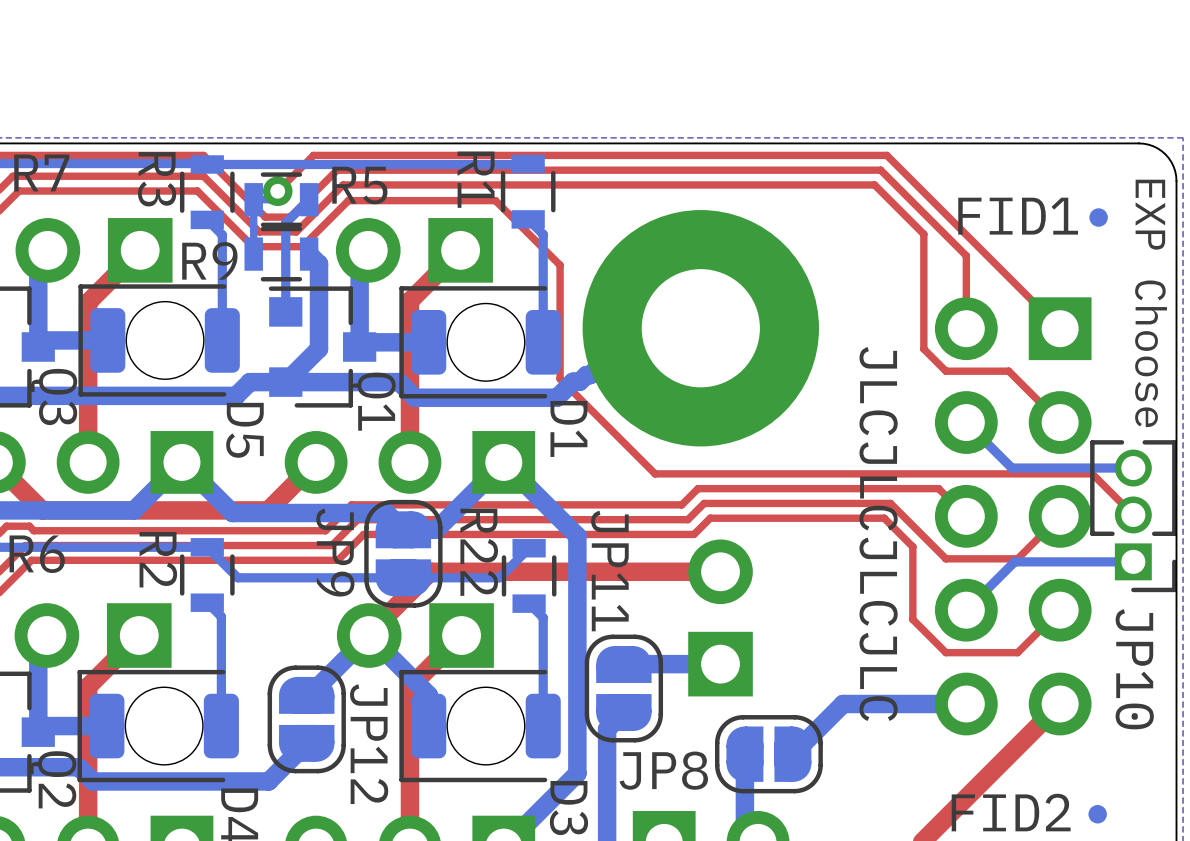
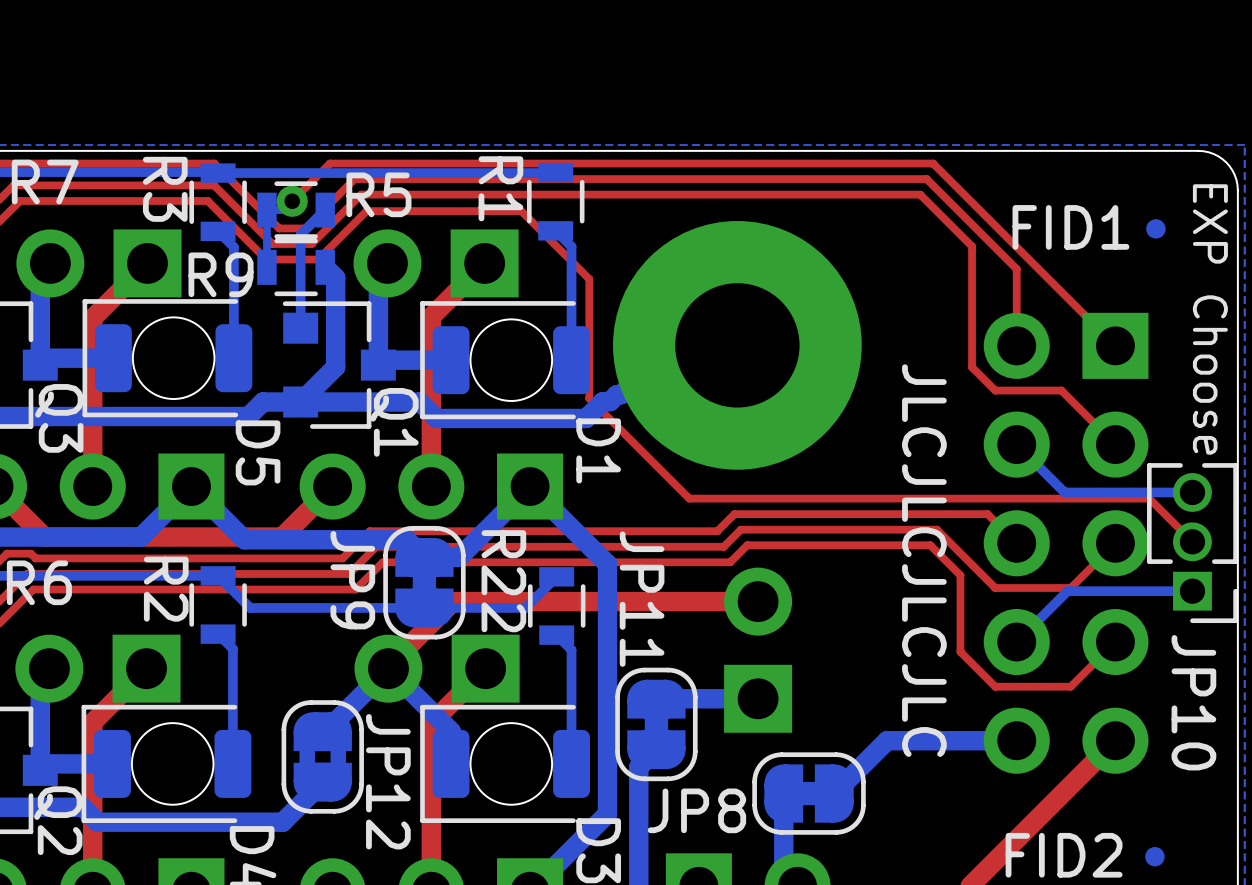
JP9 footprint: [364, 499, 443, 608] -> [383, 525, 466, 640]
JP11 footprint: [584, 634, 664, 743] -> [615, 667, 698, 782]
JP12 footprint: [267, 665, 346, 774] -> [281, 700, 364, 814]
JP8 footprint: [714, 715, 823, 794] -> [752, 752, 866, 835]

